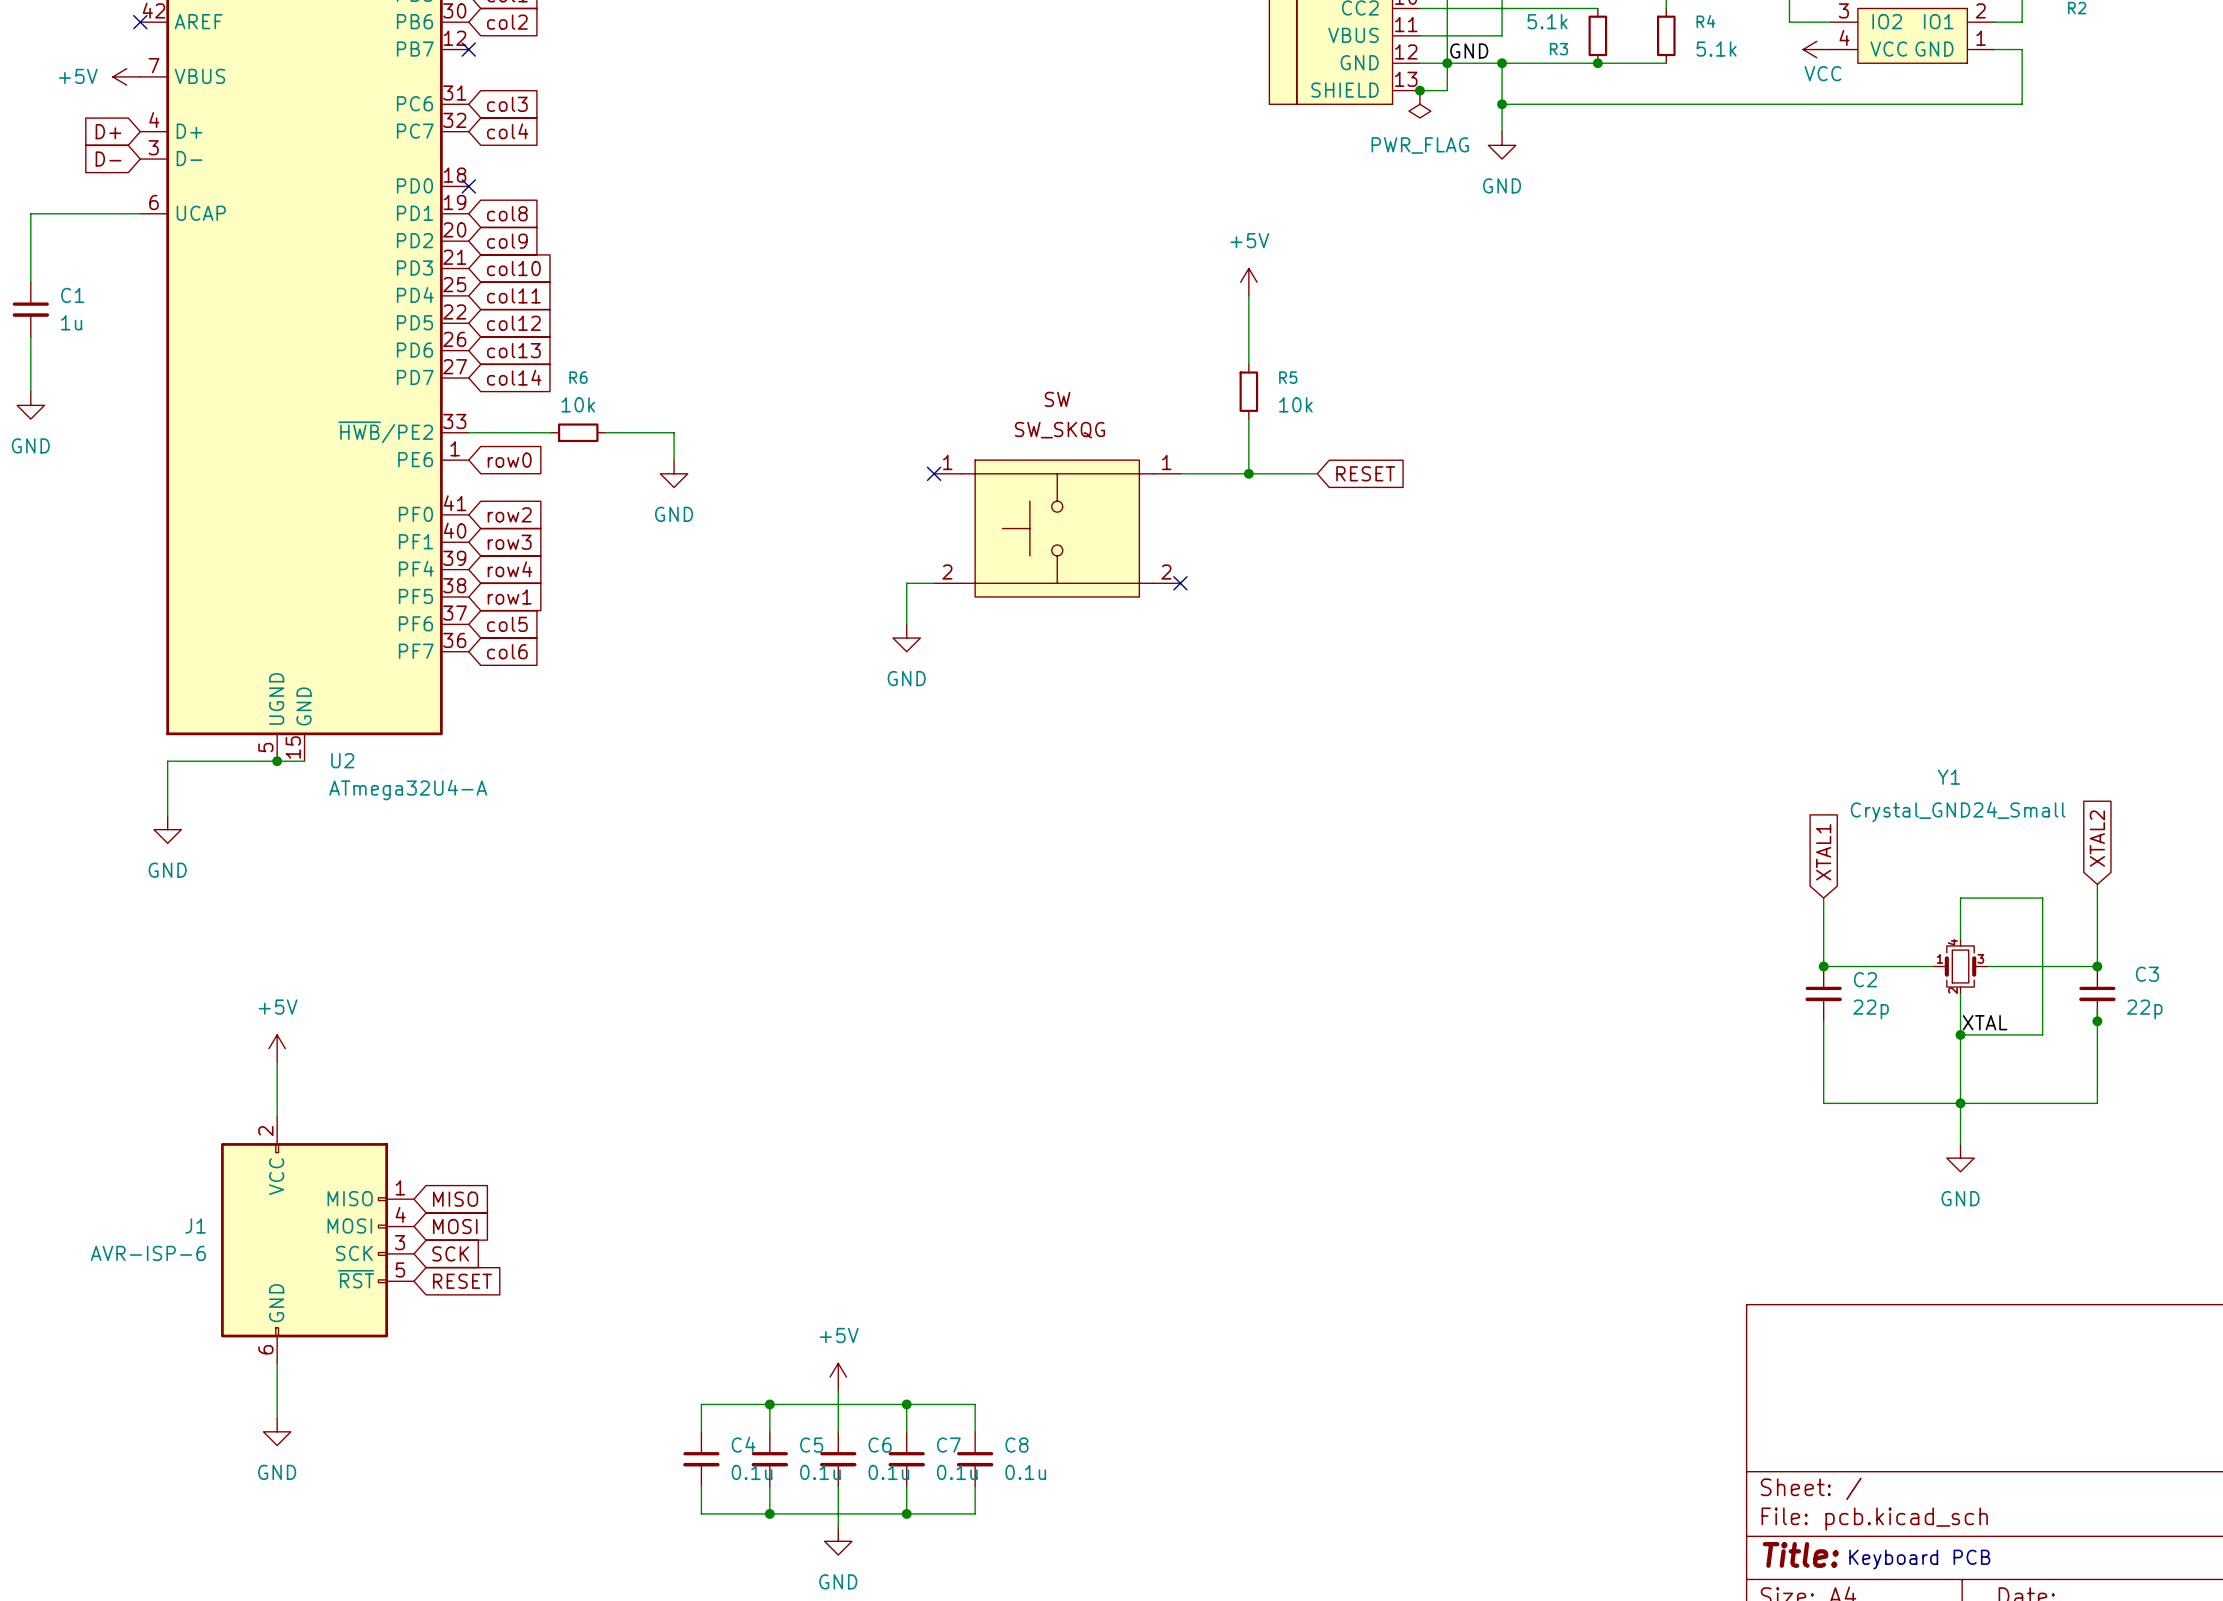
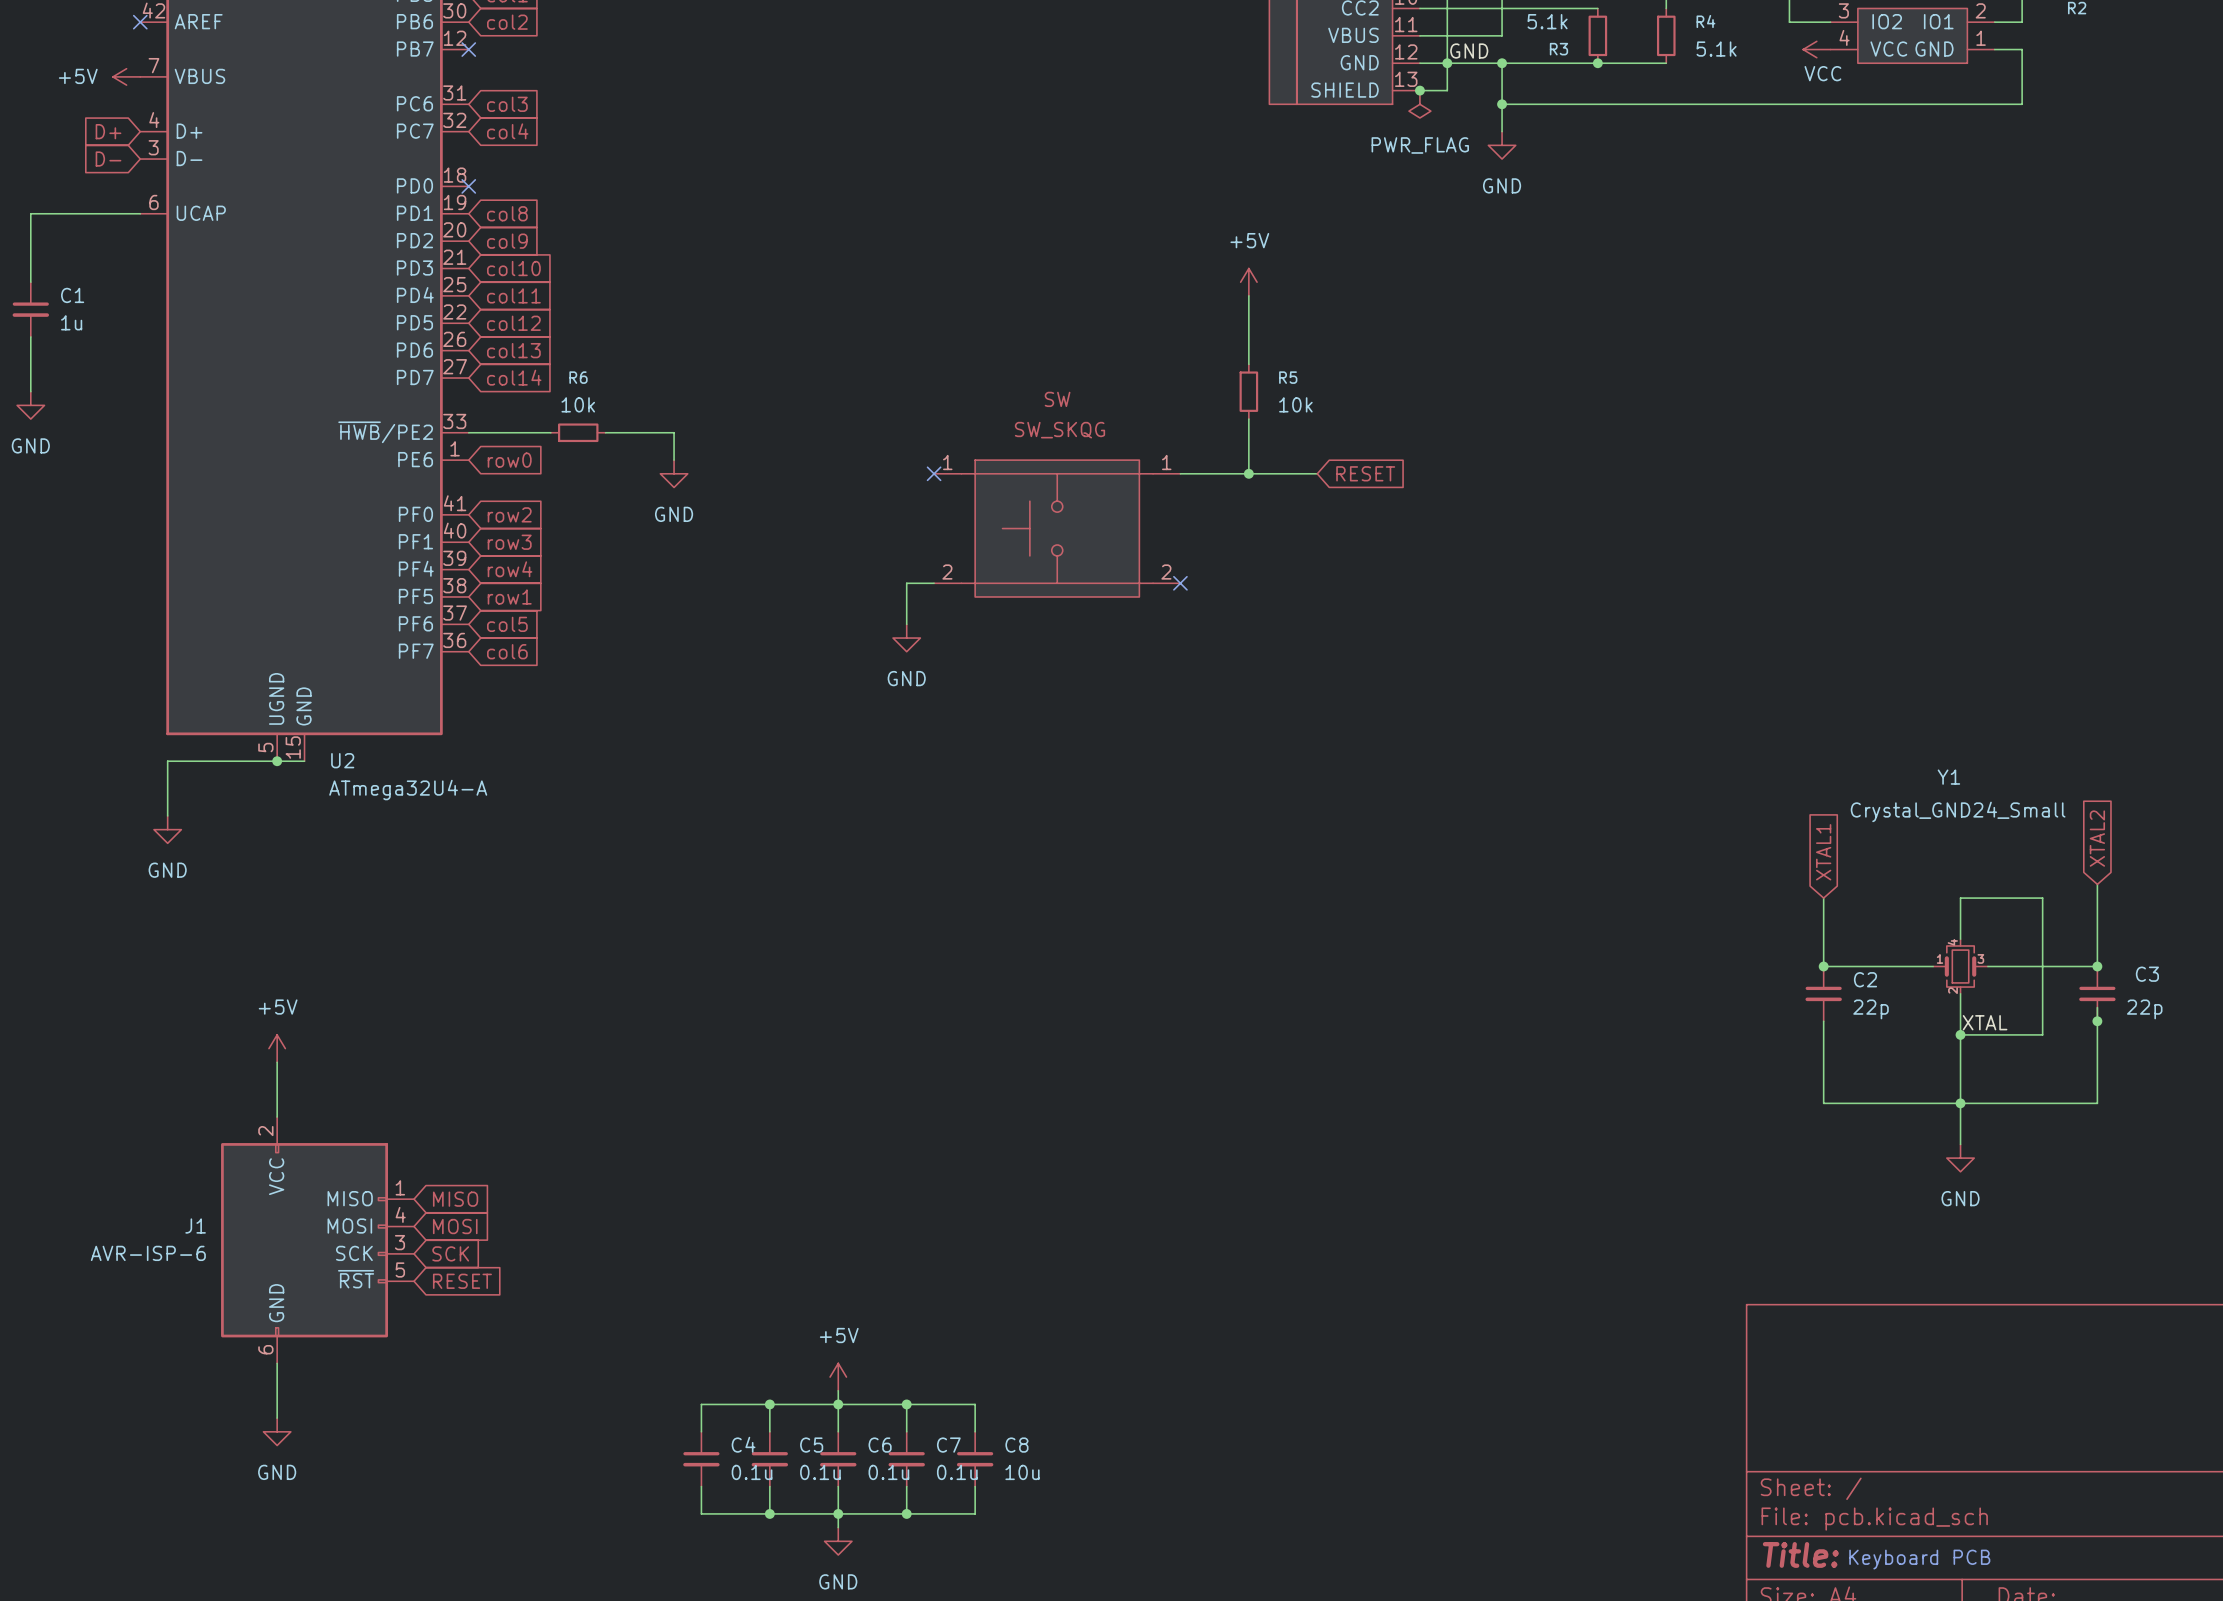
junction: none -> (838, 1404)
C8 value: 0.1u (1025, 1472) -> 10u (1022, 1472)
junction: none -> (838, 1513)

